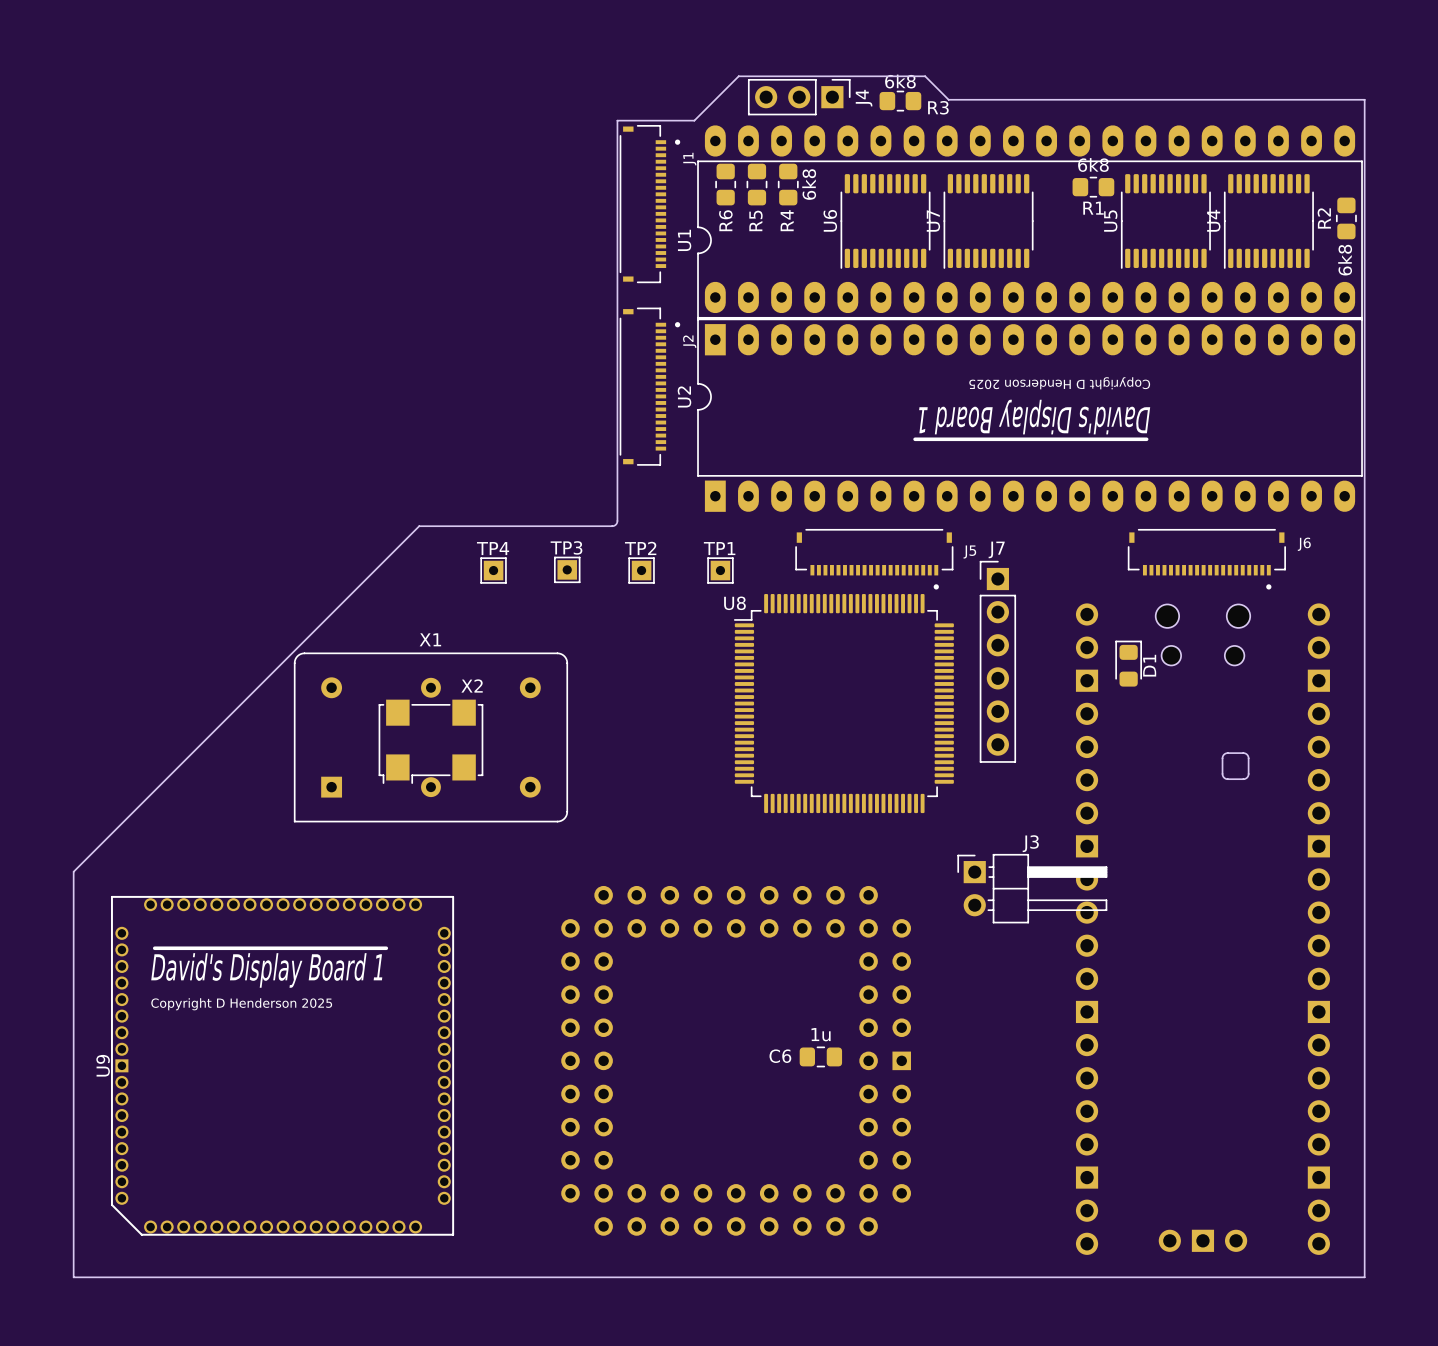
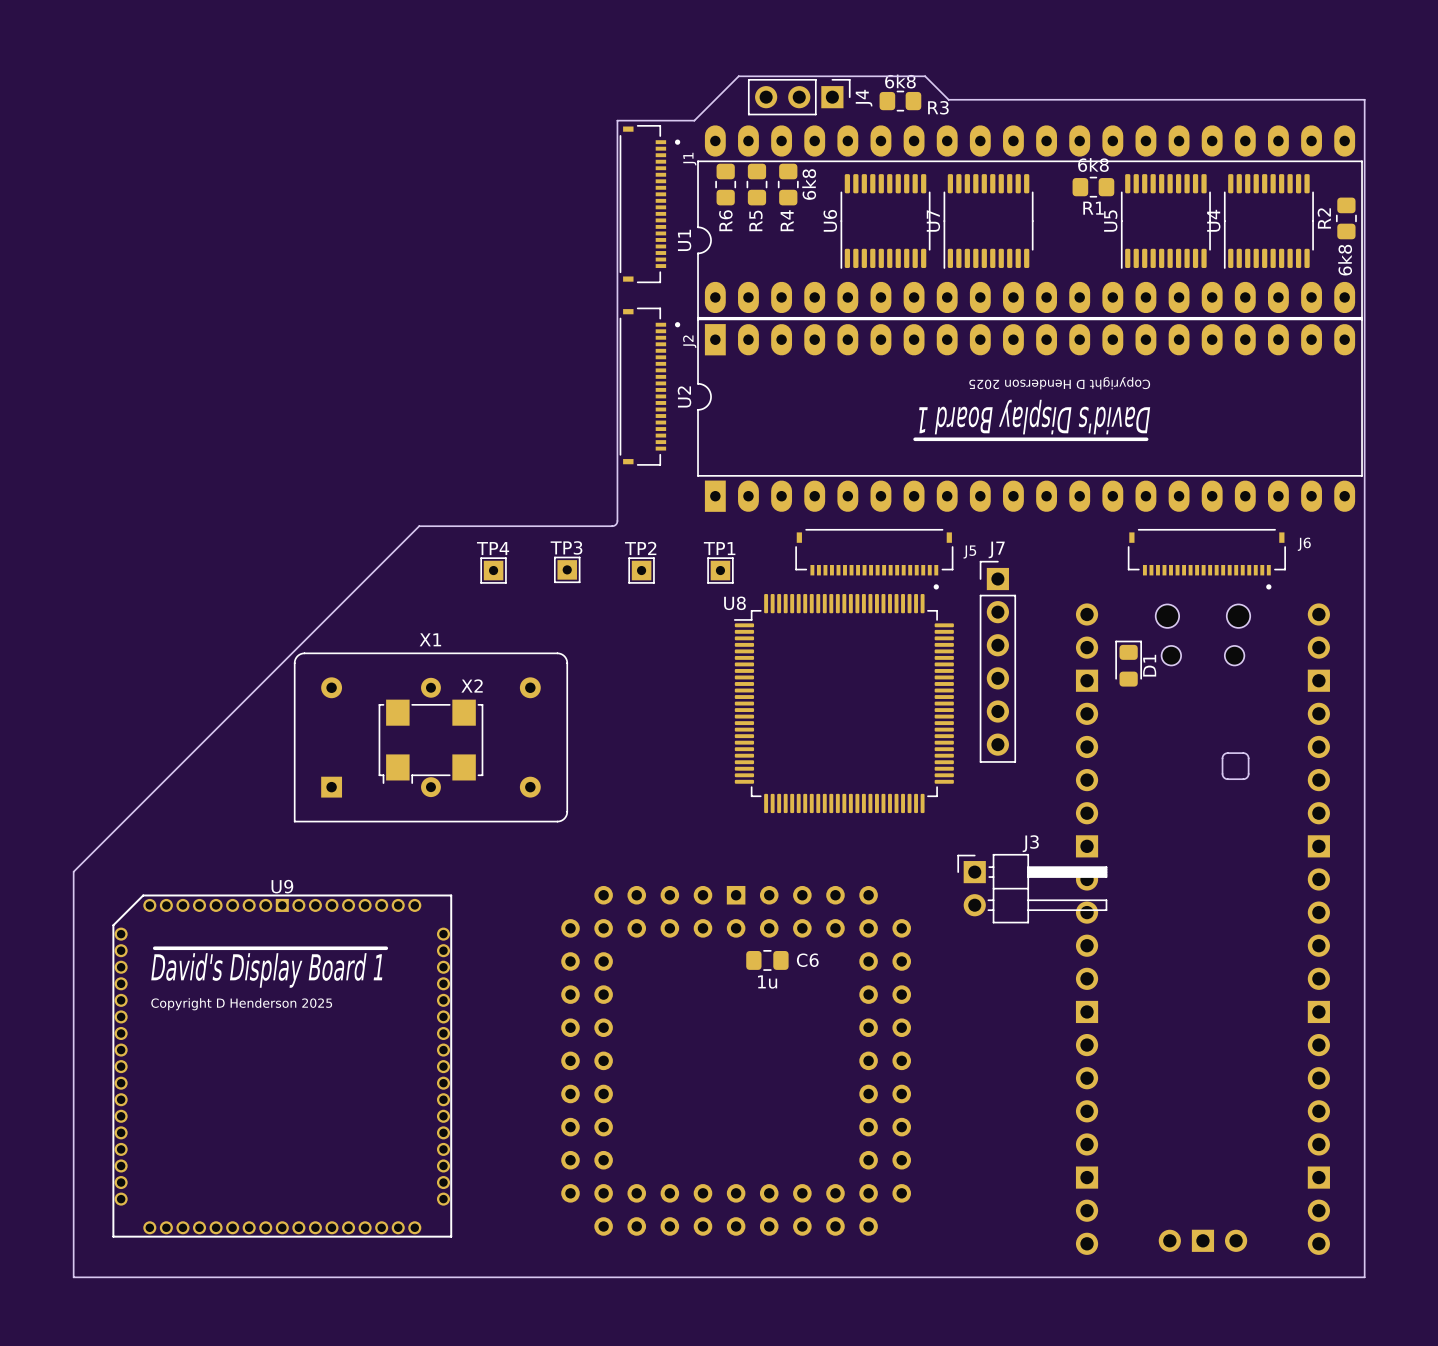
C6 value position: 1u (821, 1034) -> 1u (767, 981)
C6 name position: C6 (780, 1056) -> C6 (807, 960)
C6 position: (820, 1056) -> (767, 960)
part rotation: 0° (736, 1060) -> 90° counterclockwise (736, 1060)
U9 rotation: 0° (282, 1065) -> 90° clockwise (282, 1066)

